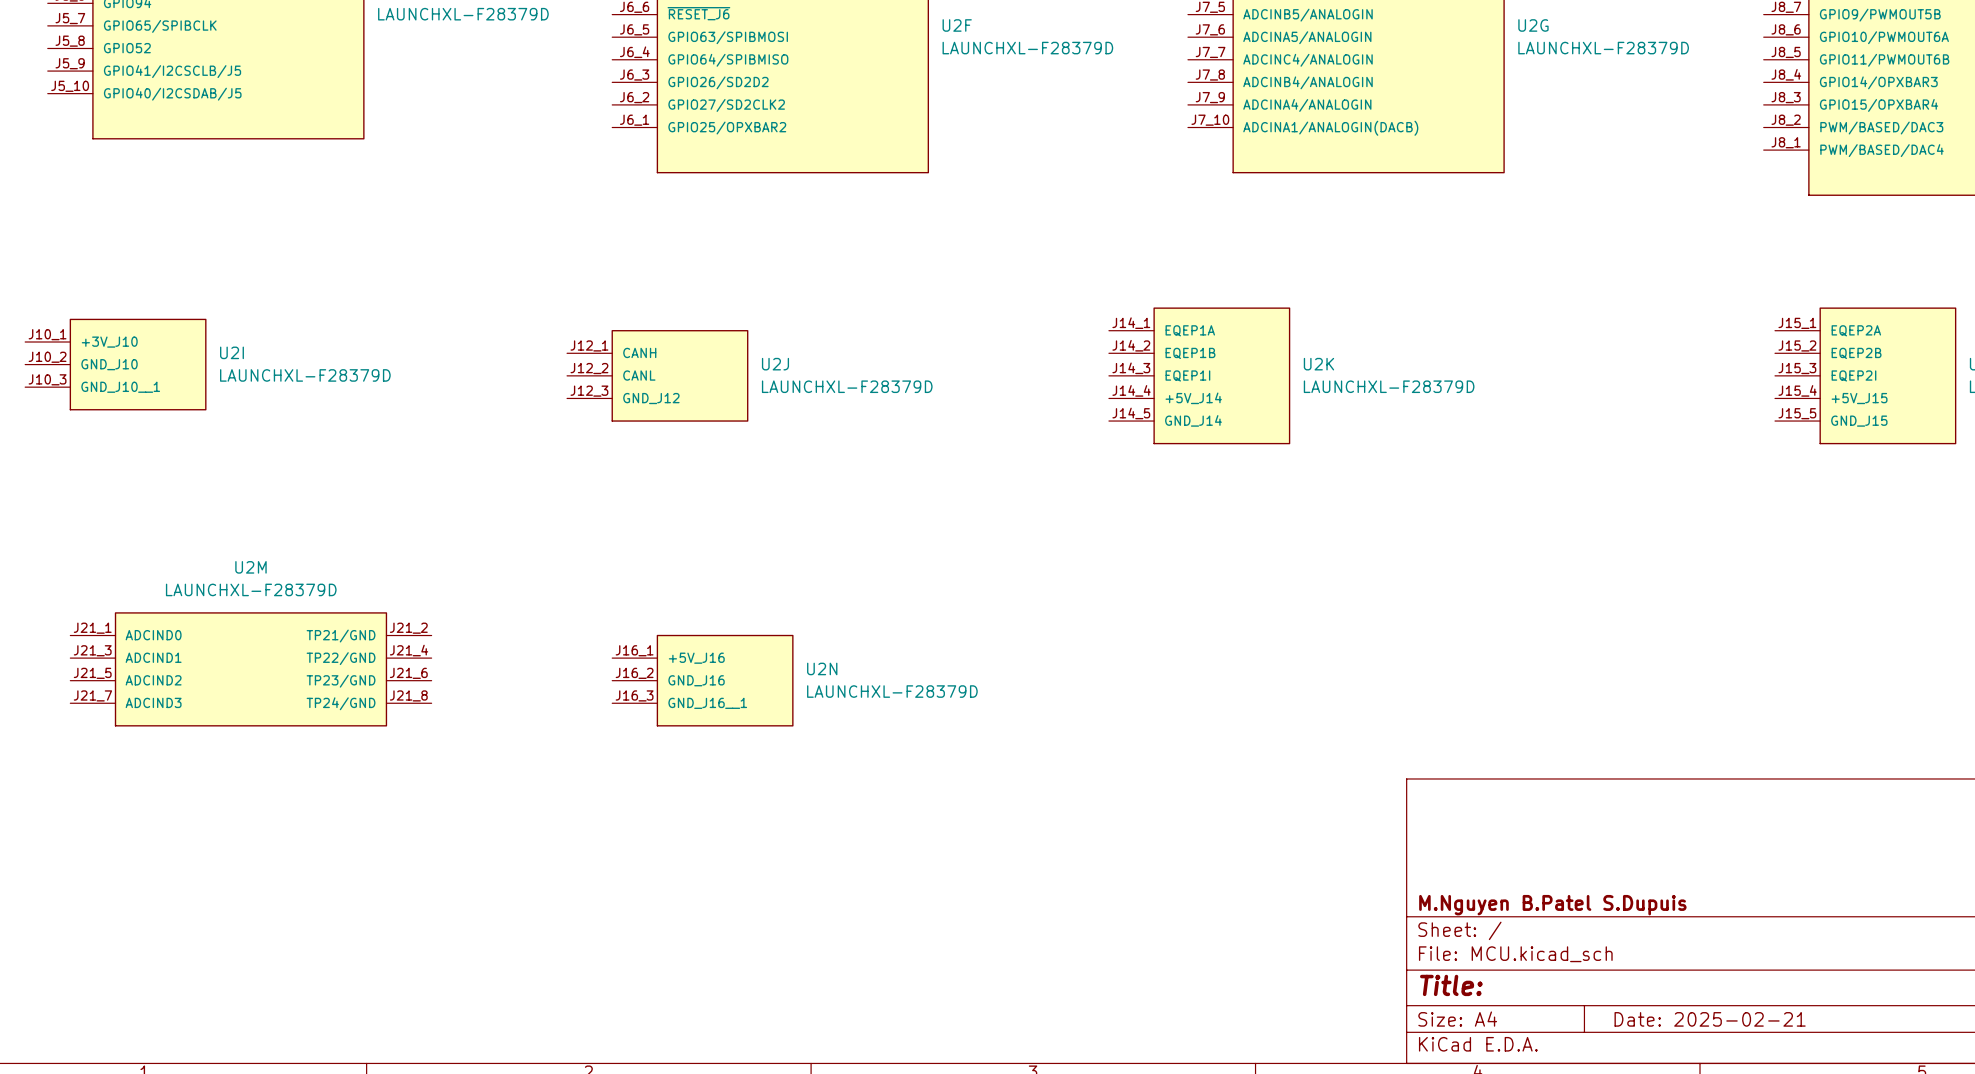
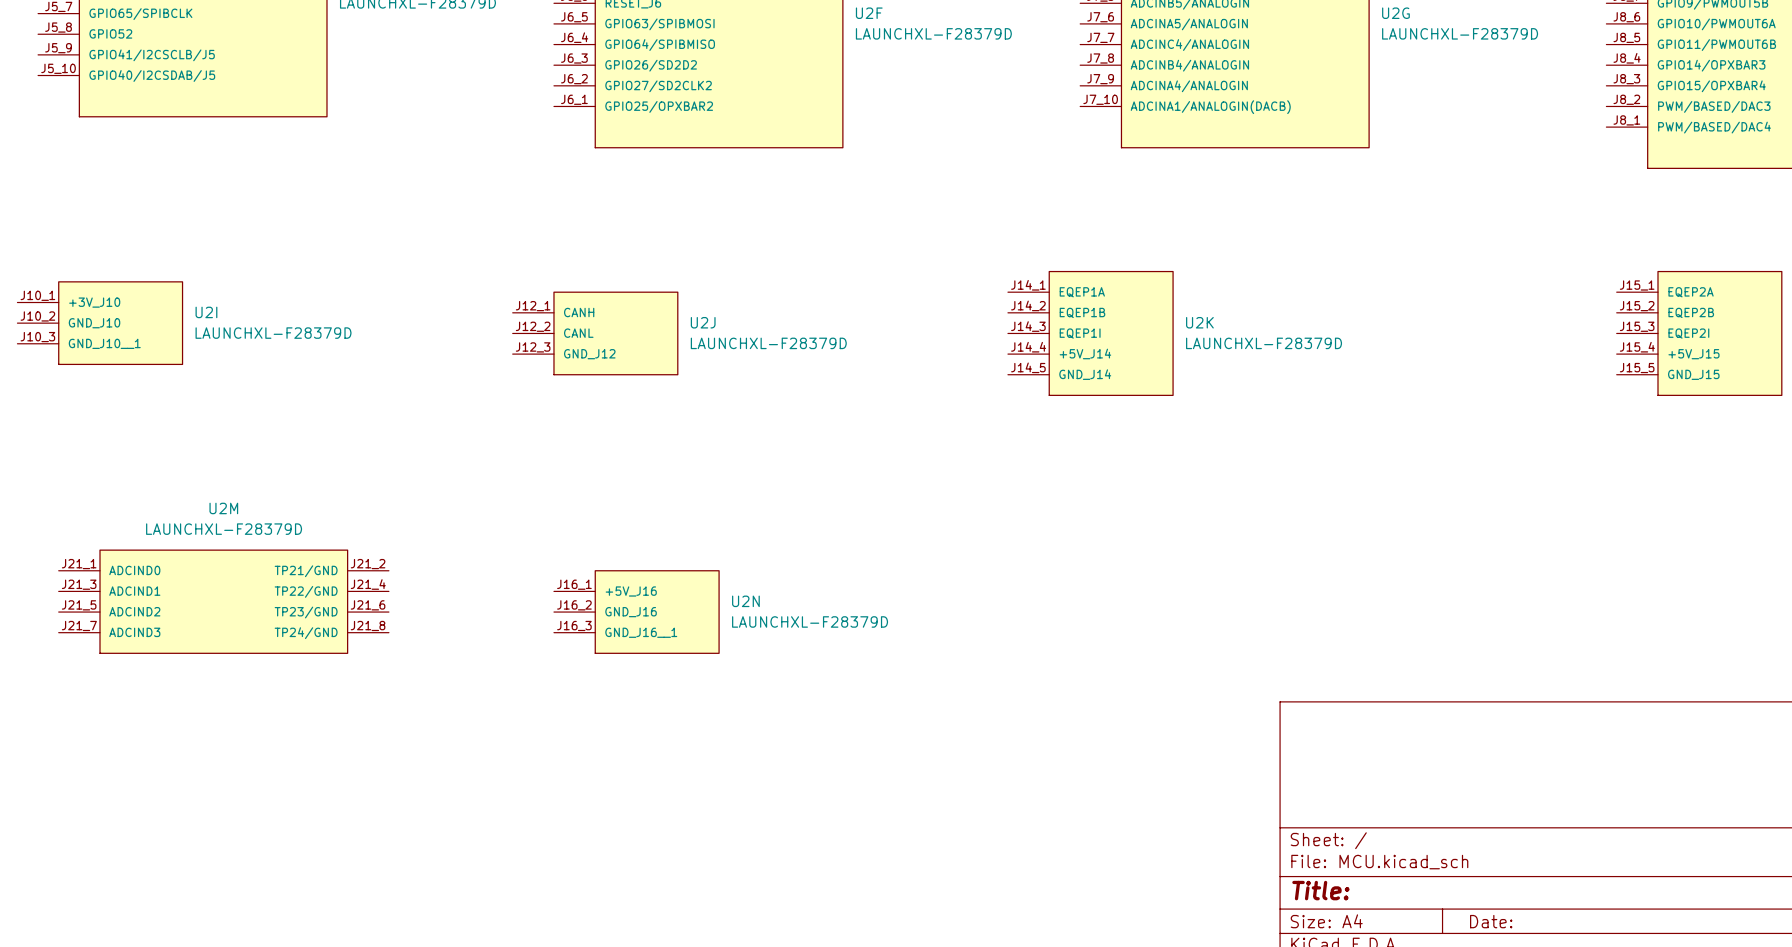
title block: M.Nguyen B.Patel S.Dupuis (1552, 905) -> none
title block: Date: 2025-02-21 (1710, 1019) -> Date: (1491, 921)

